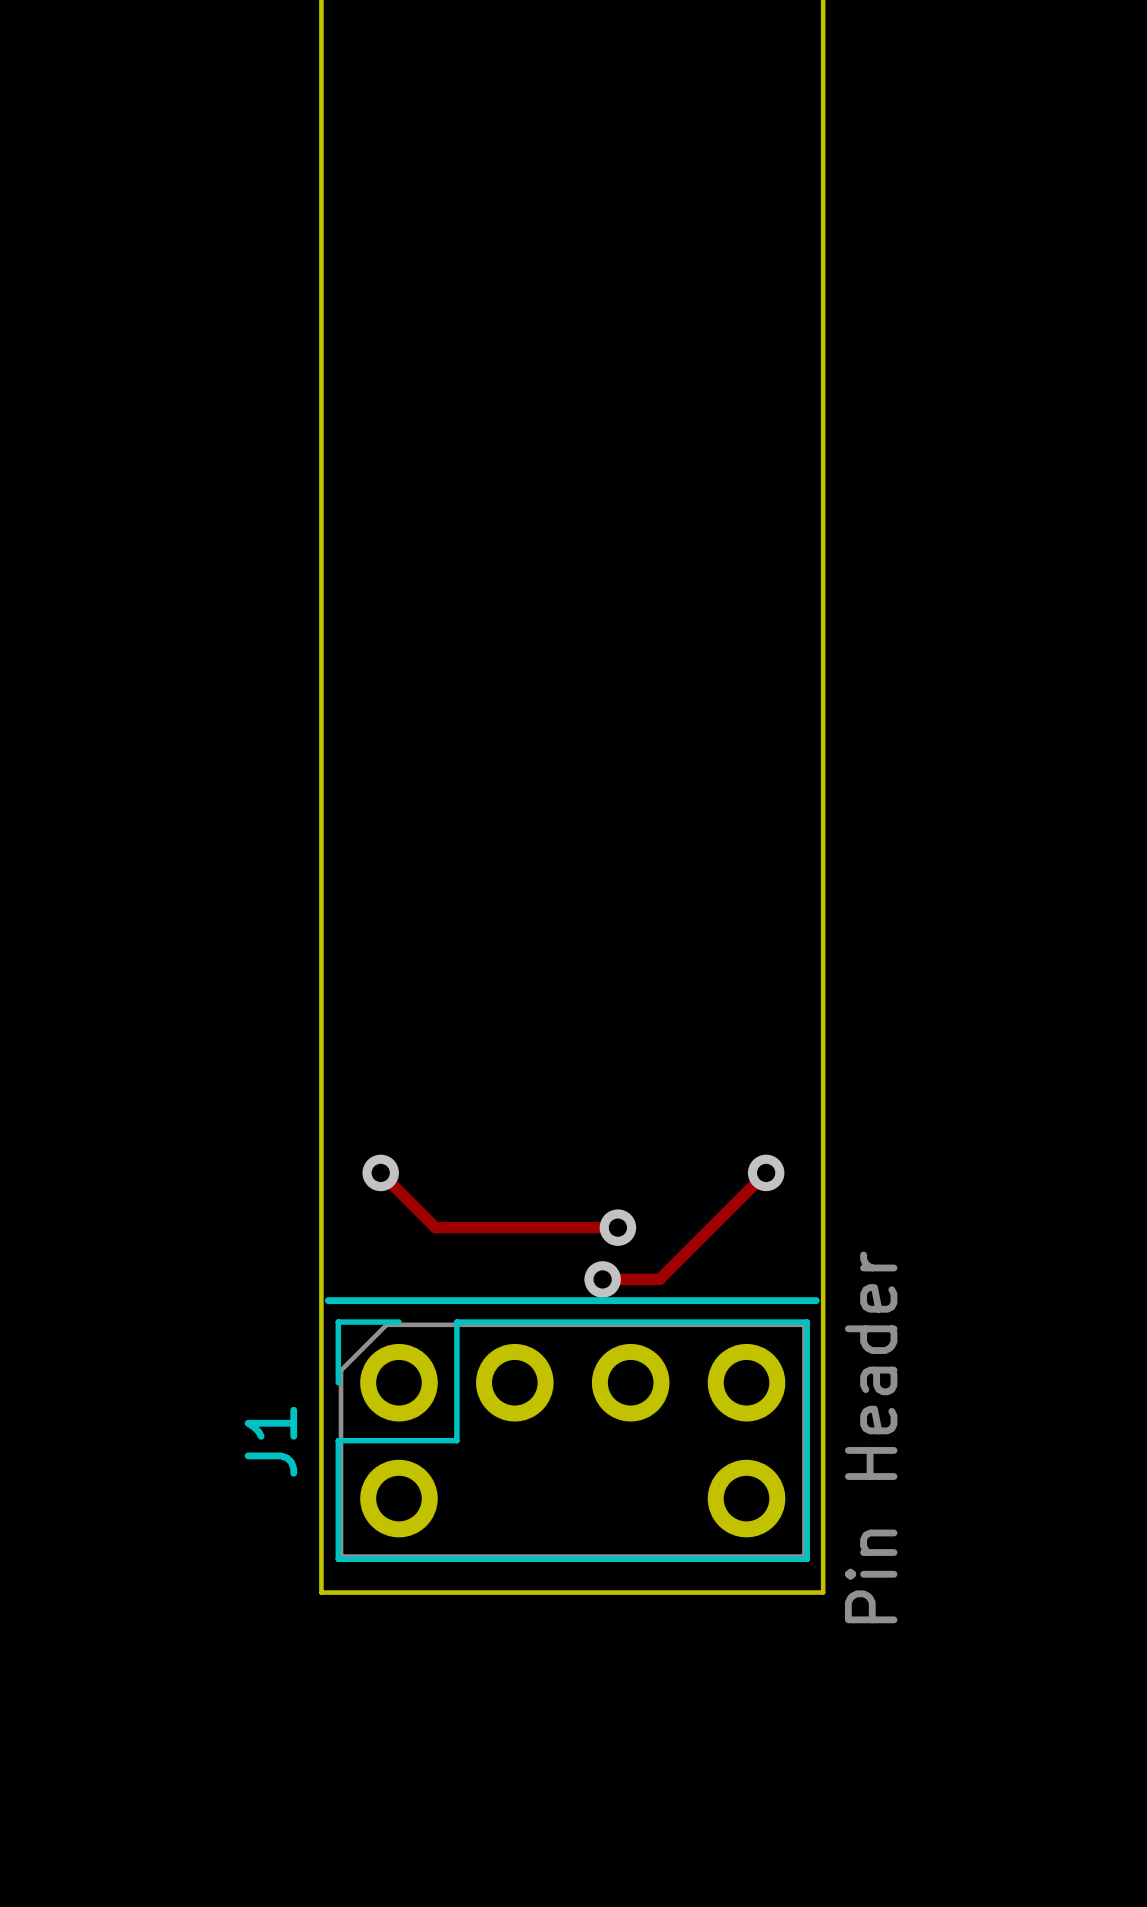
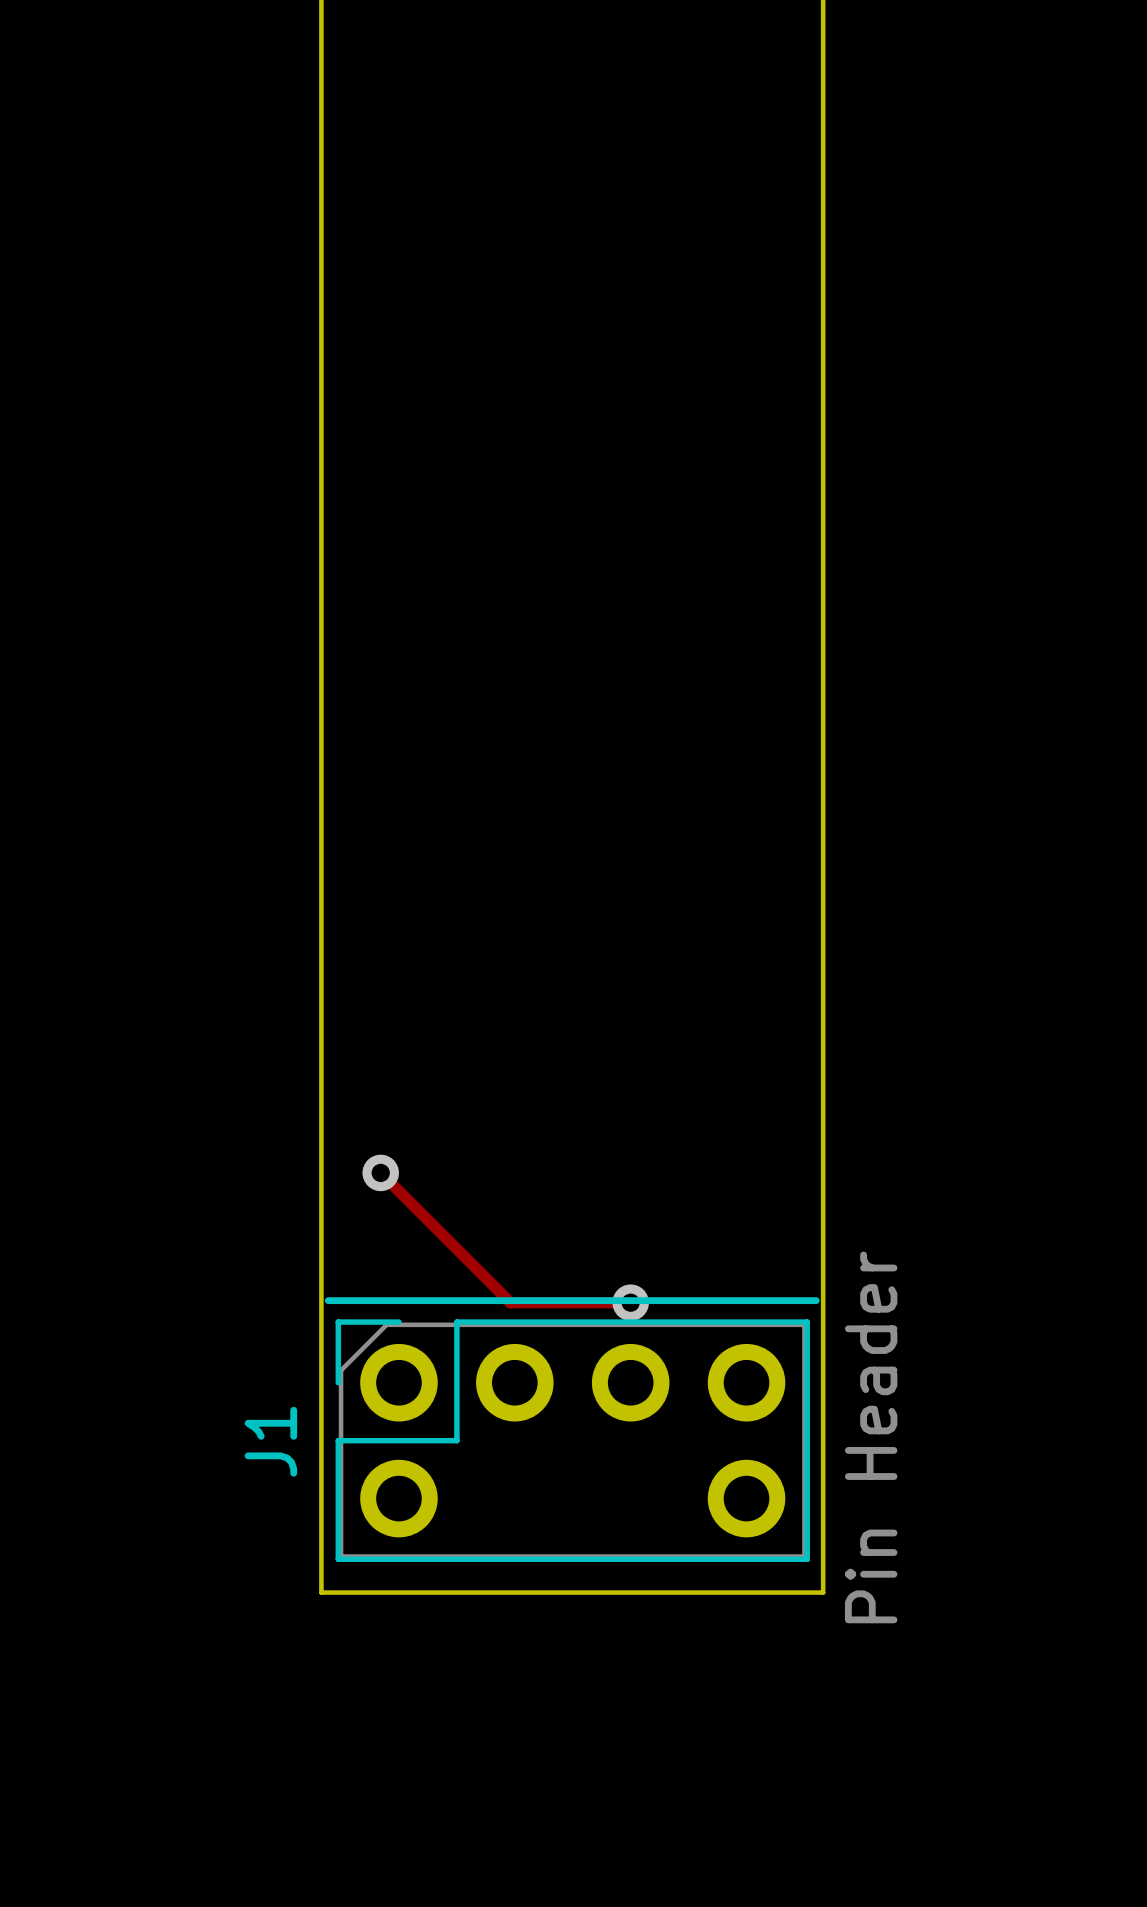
track: (766, 1172) (659, 1279) (602, 1279) -> none
via: (766, 1172) -> none
track: (435, 1227) (617, 1227) -> (435, 1227) (510, 1302) (630, 1302)
via: (617, 1227) -> none
via position: (602, 1279) -> (630, 1302)

